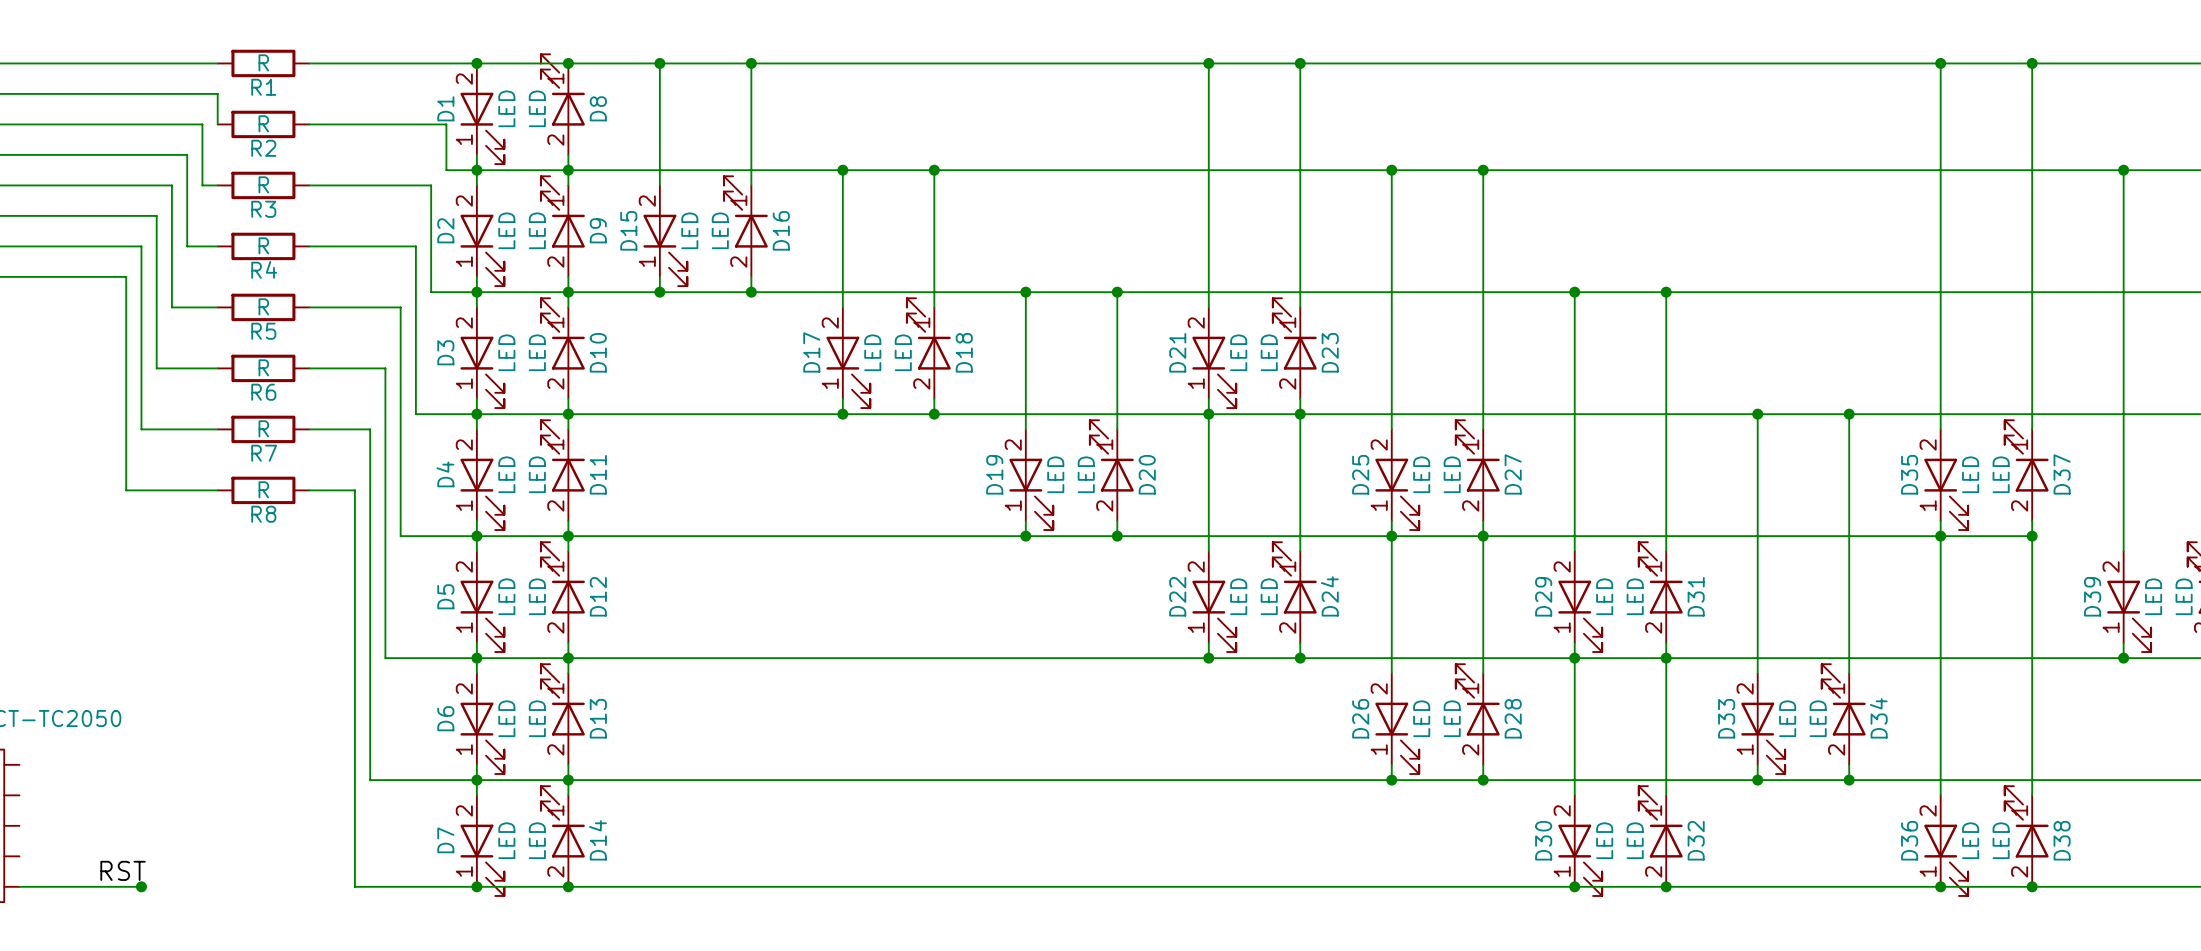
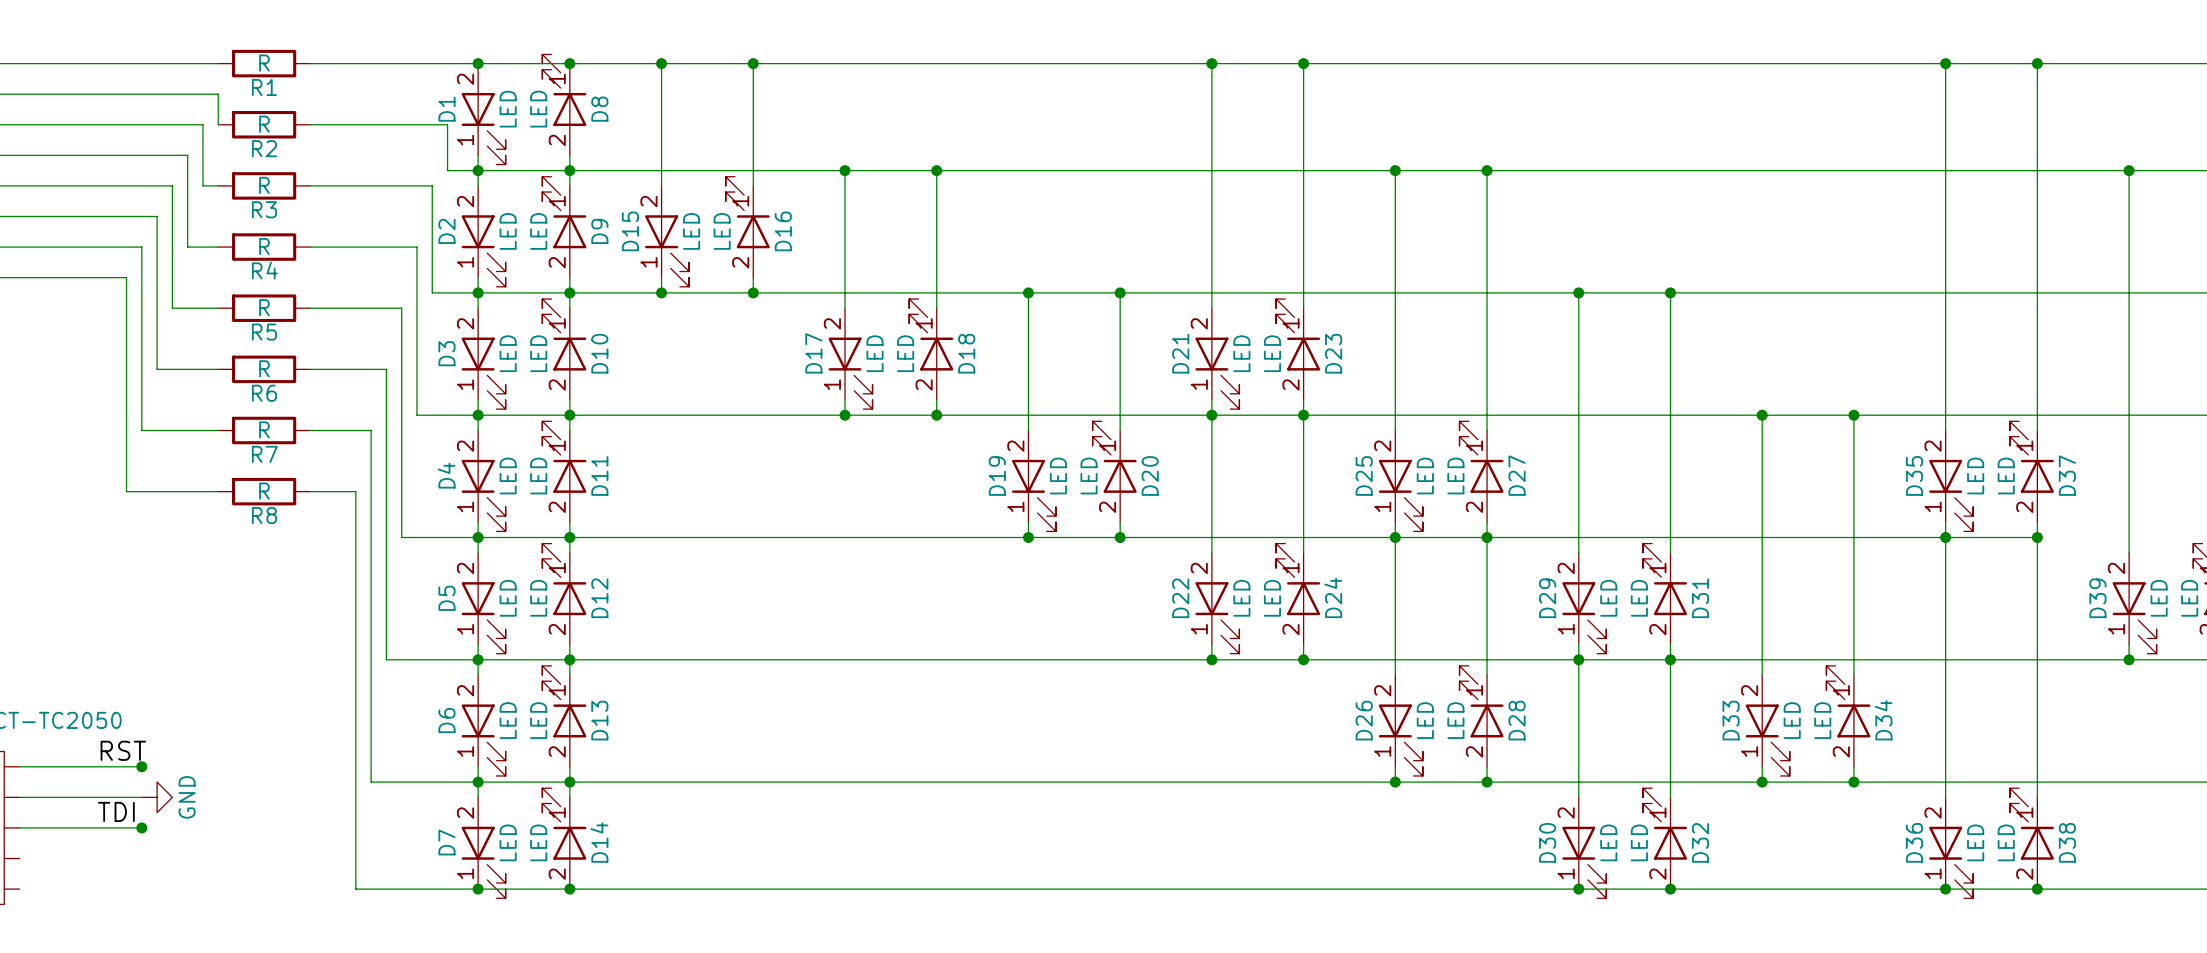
wire: none -> (19, 766) (141, 766)
junction: none -> (141, 766)
wire: none -> (19, 797) (141, 797)
power symbol: none -> GND (157, 797)
label: none -> TDI (116, 811)
junction: none -> (141, 827)
label position: RST (123, 870) -> RST (123, 750)
wire: (19, 886) (141, 886) -> (19, 827) (141, 827)
junction: (141, 886) -> none

